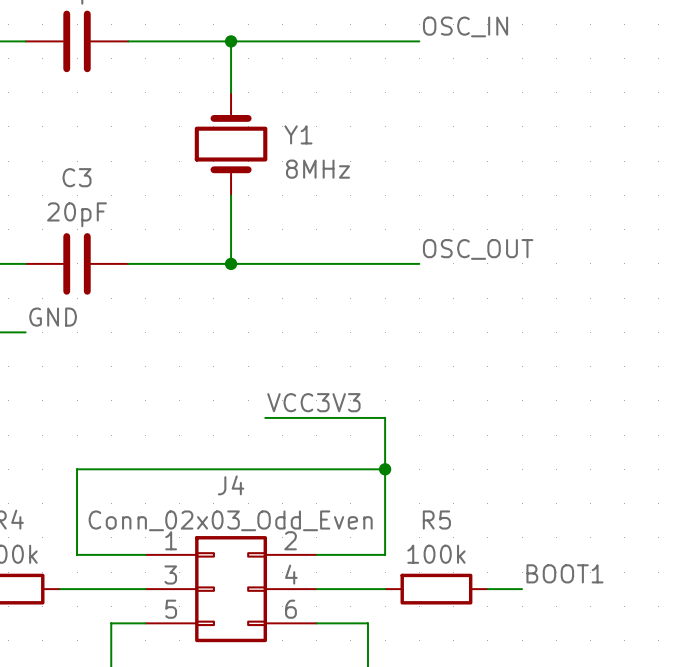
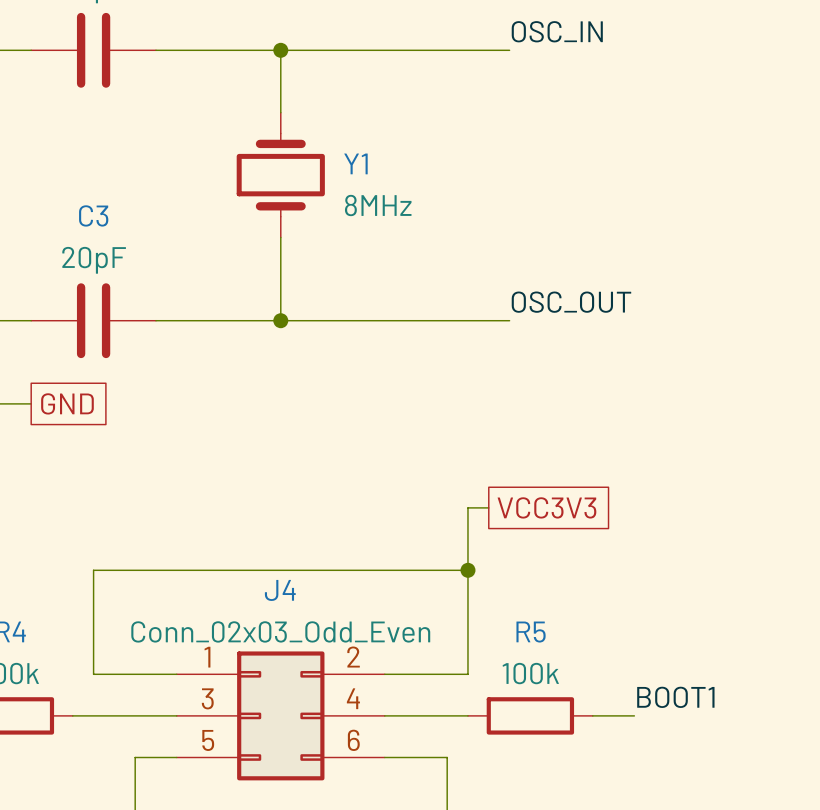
label: GND (53, 317) -> none
global label: none -> GND (67, 403)
label: VCC3V3 (313, 402) -> none
wire: (265, 417) (385, 417) -> (488, 507) (467, 507)
global label: none -> VCC3V3 (546, 507)

